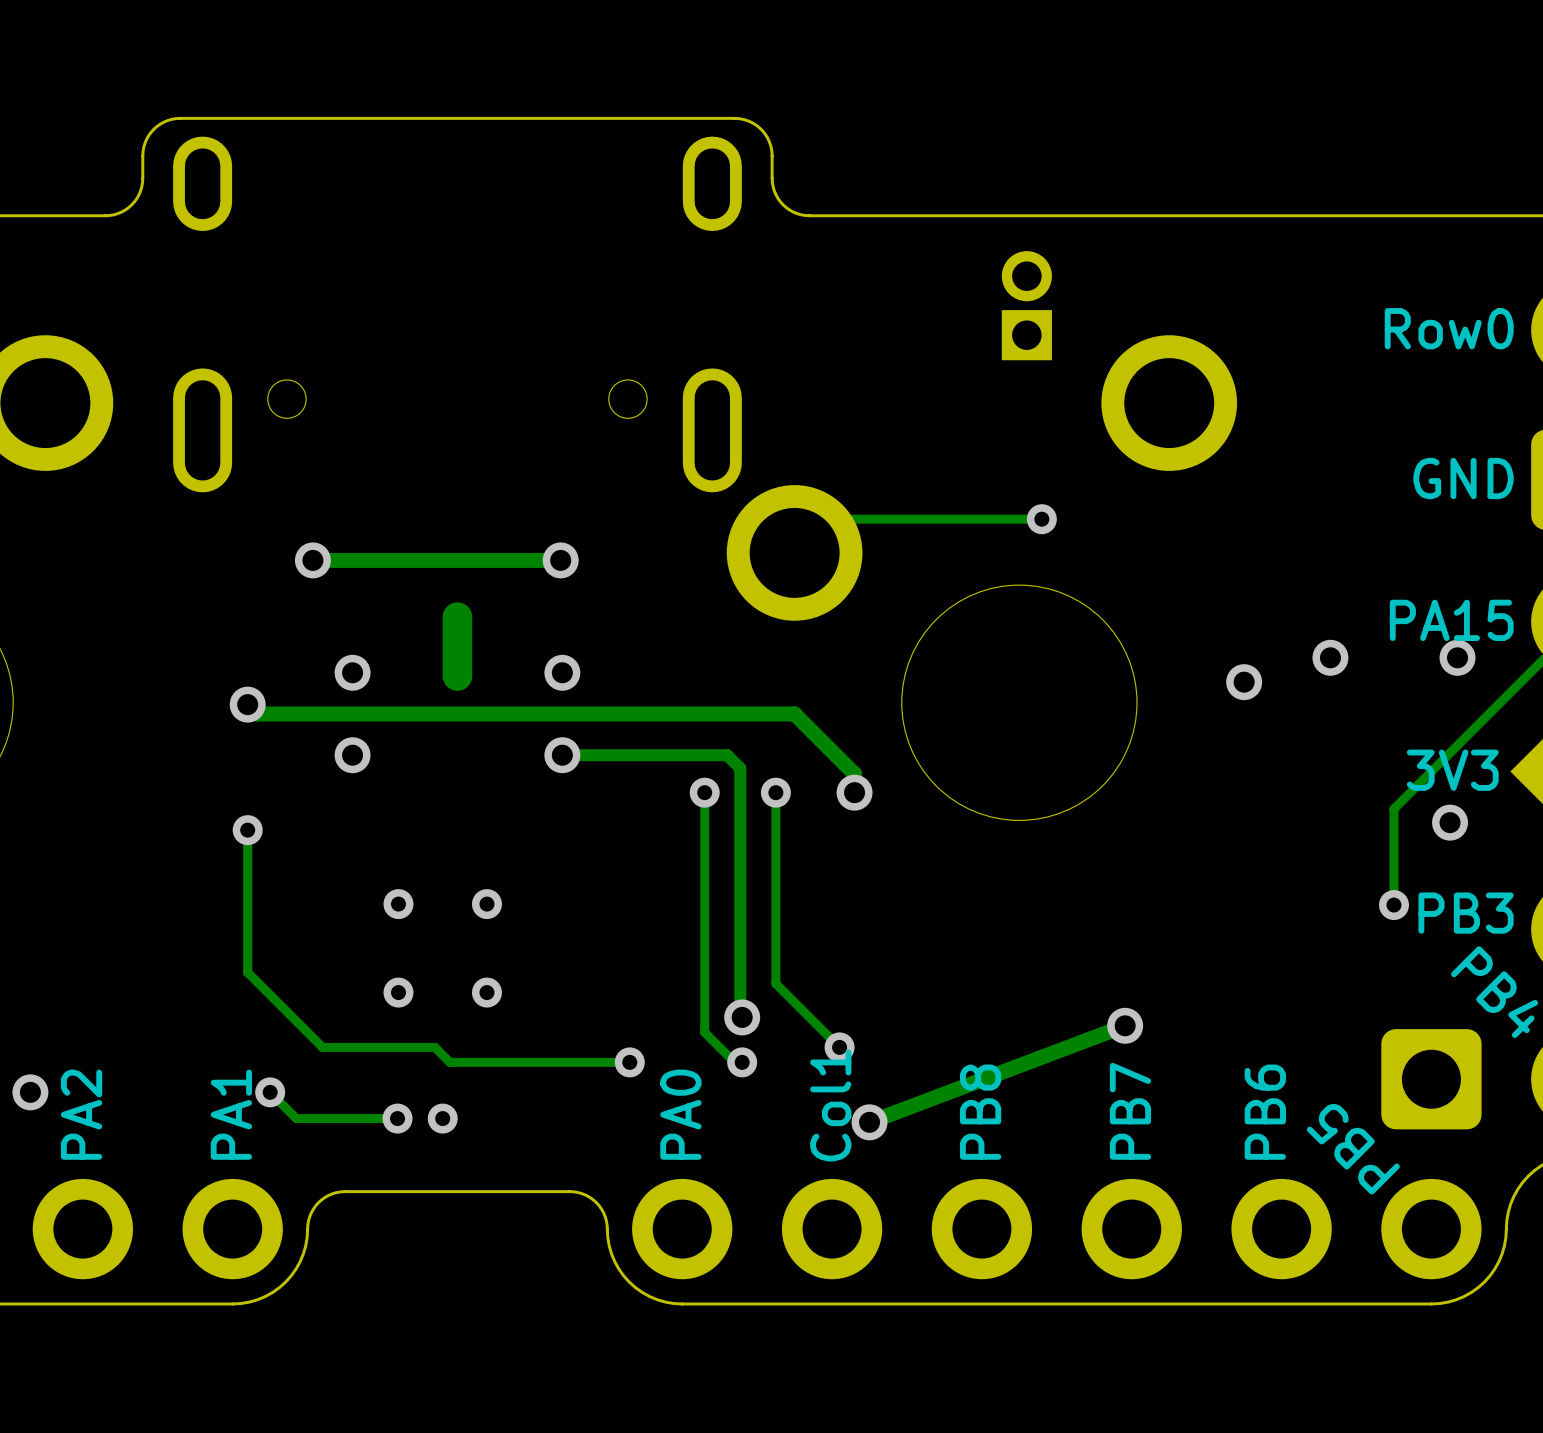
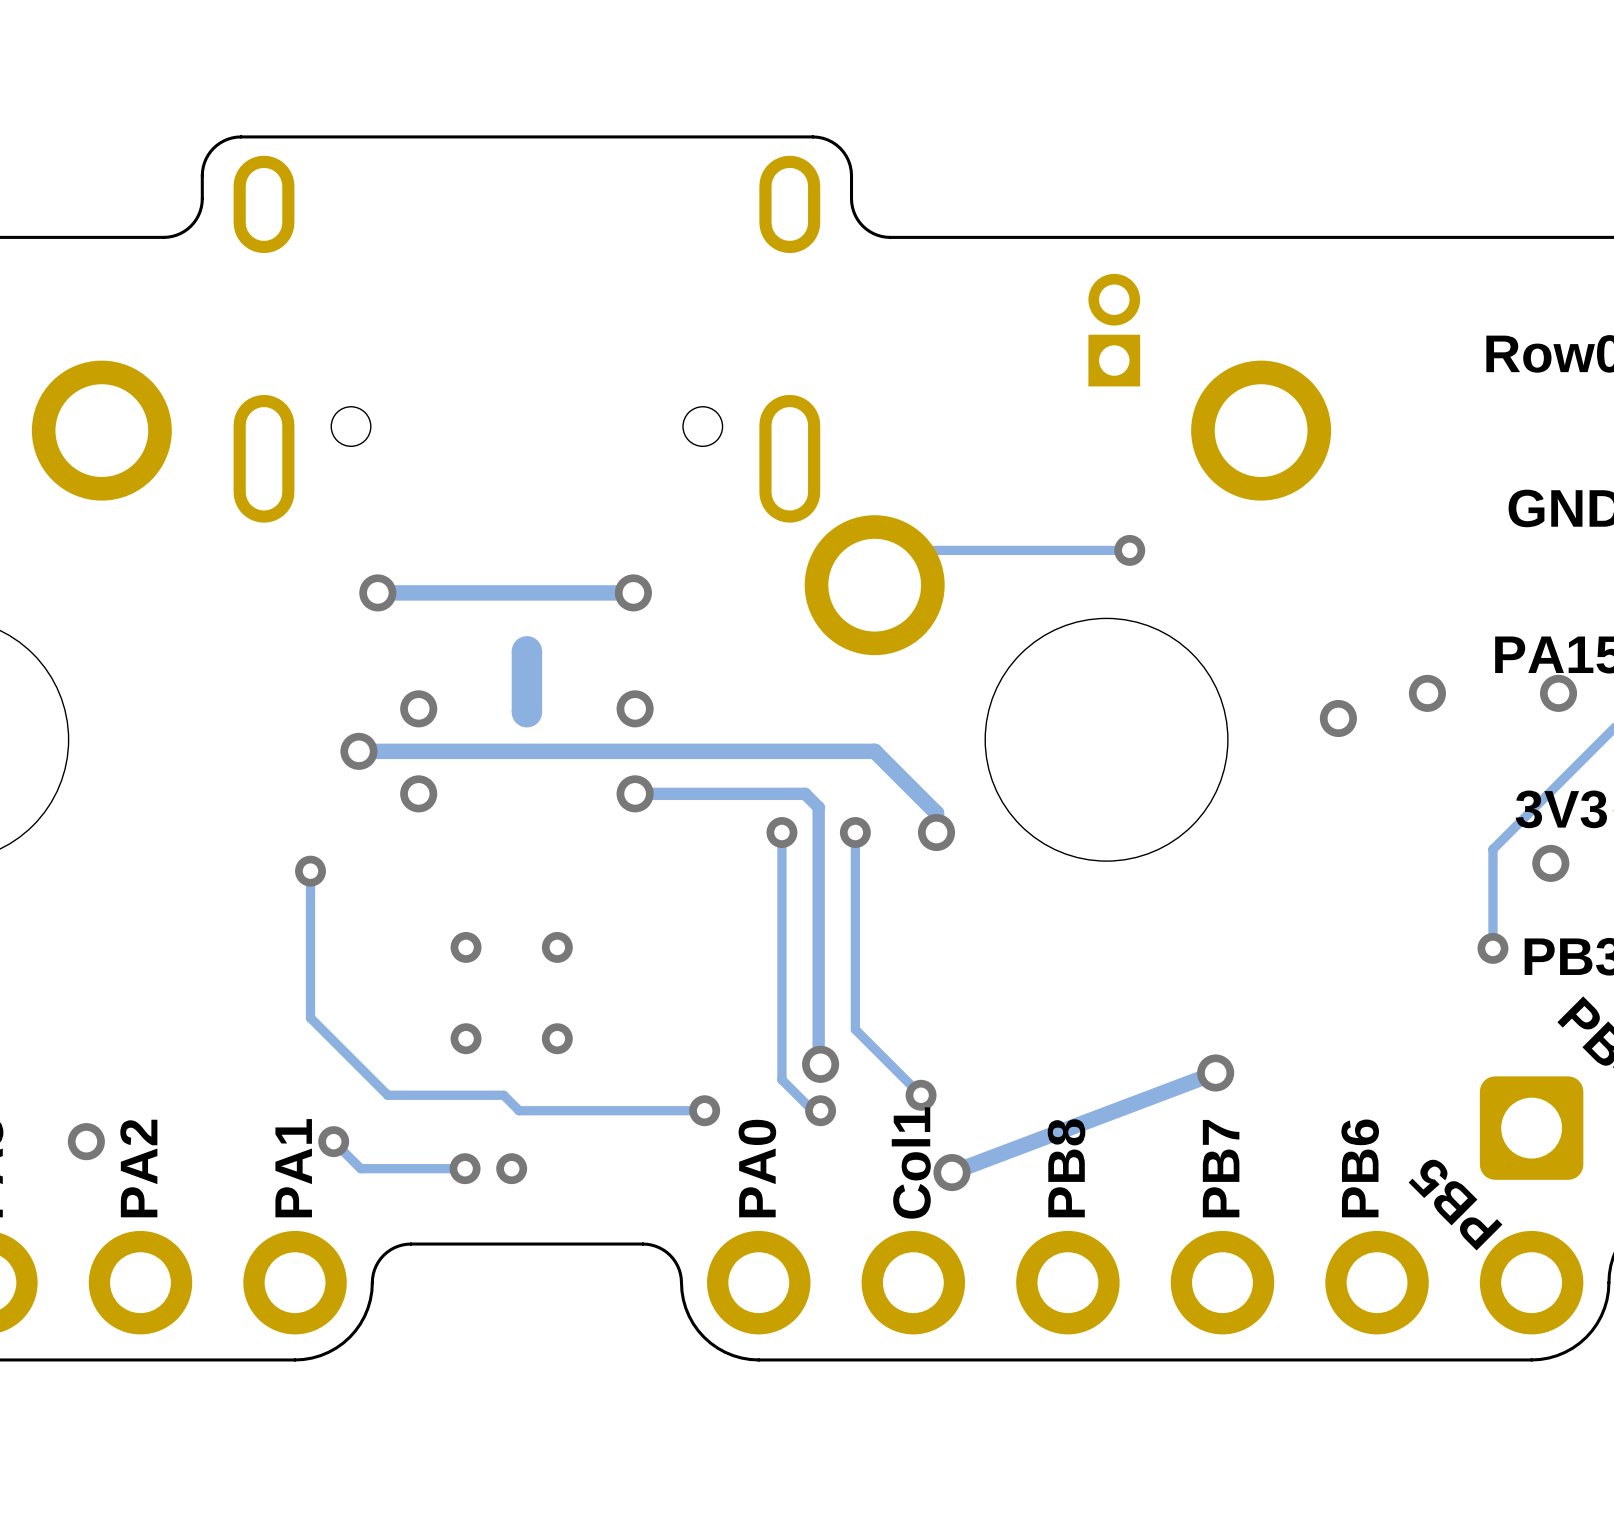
track: (247, 704) (257, 714) (294, 714) -> none
via position: (247, 704) -> (358, 751)

